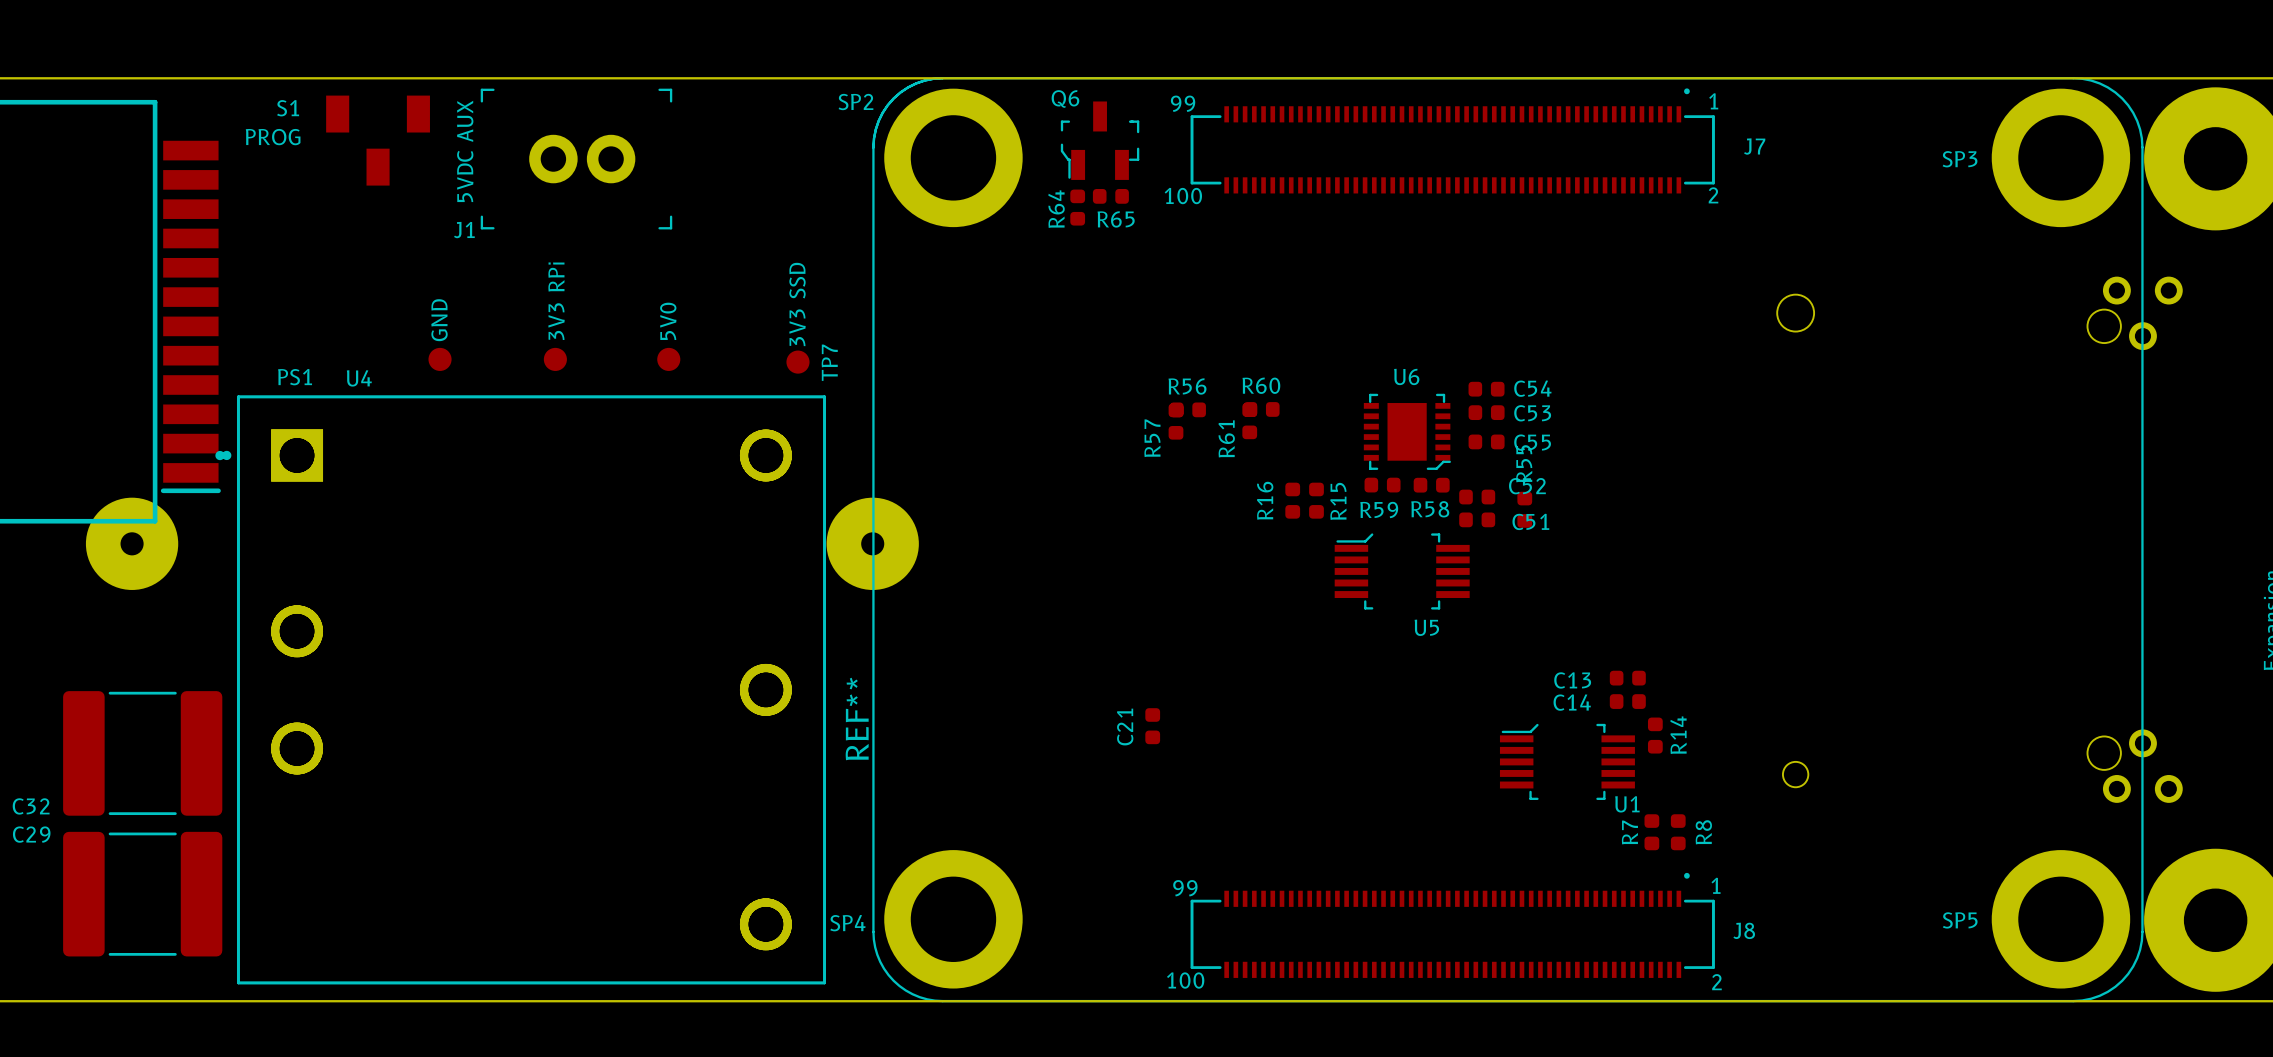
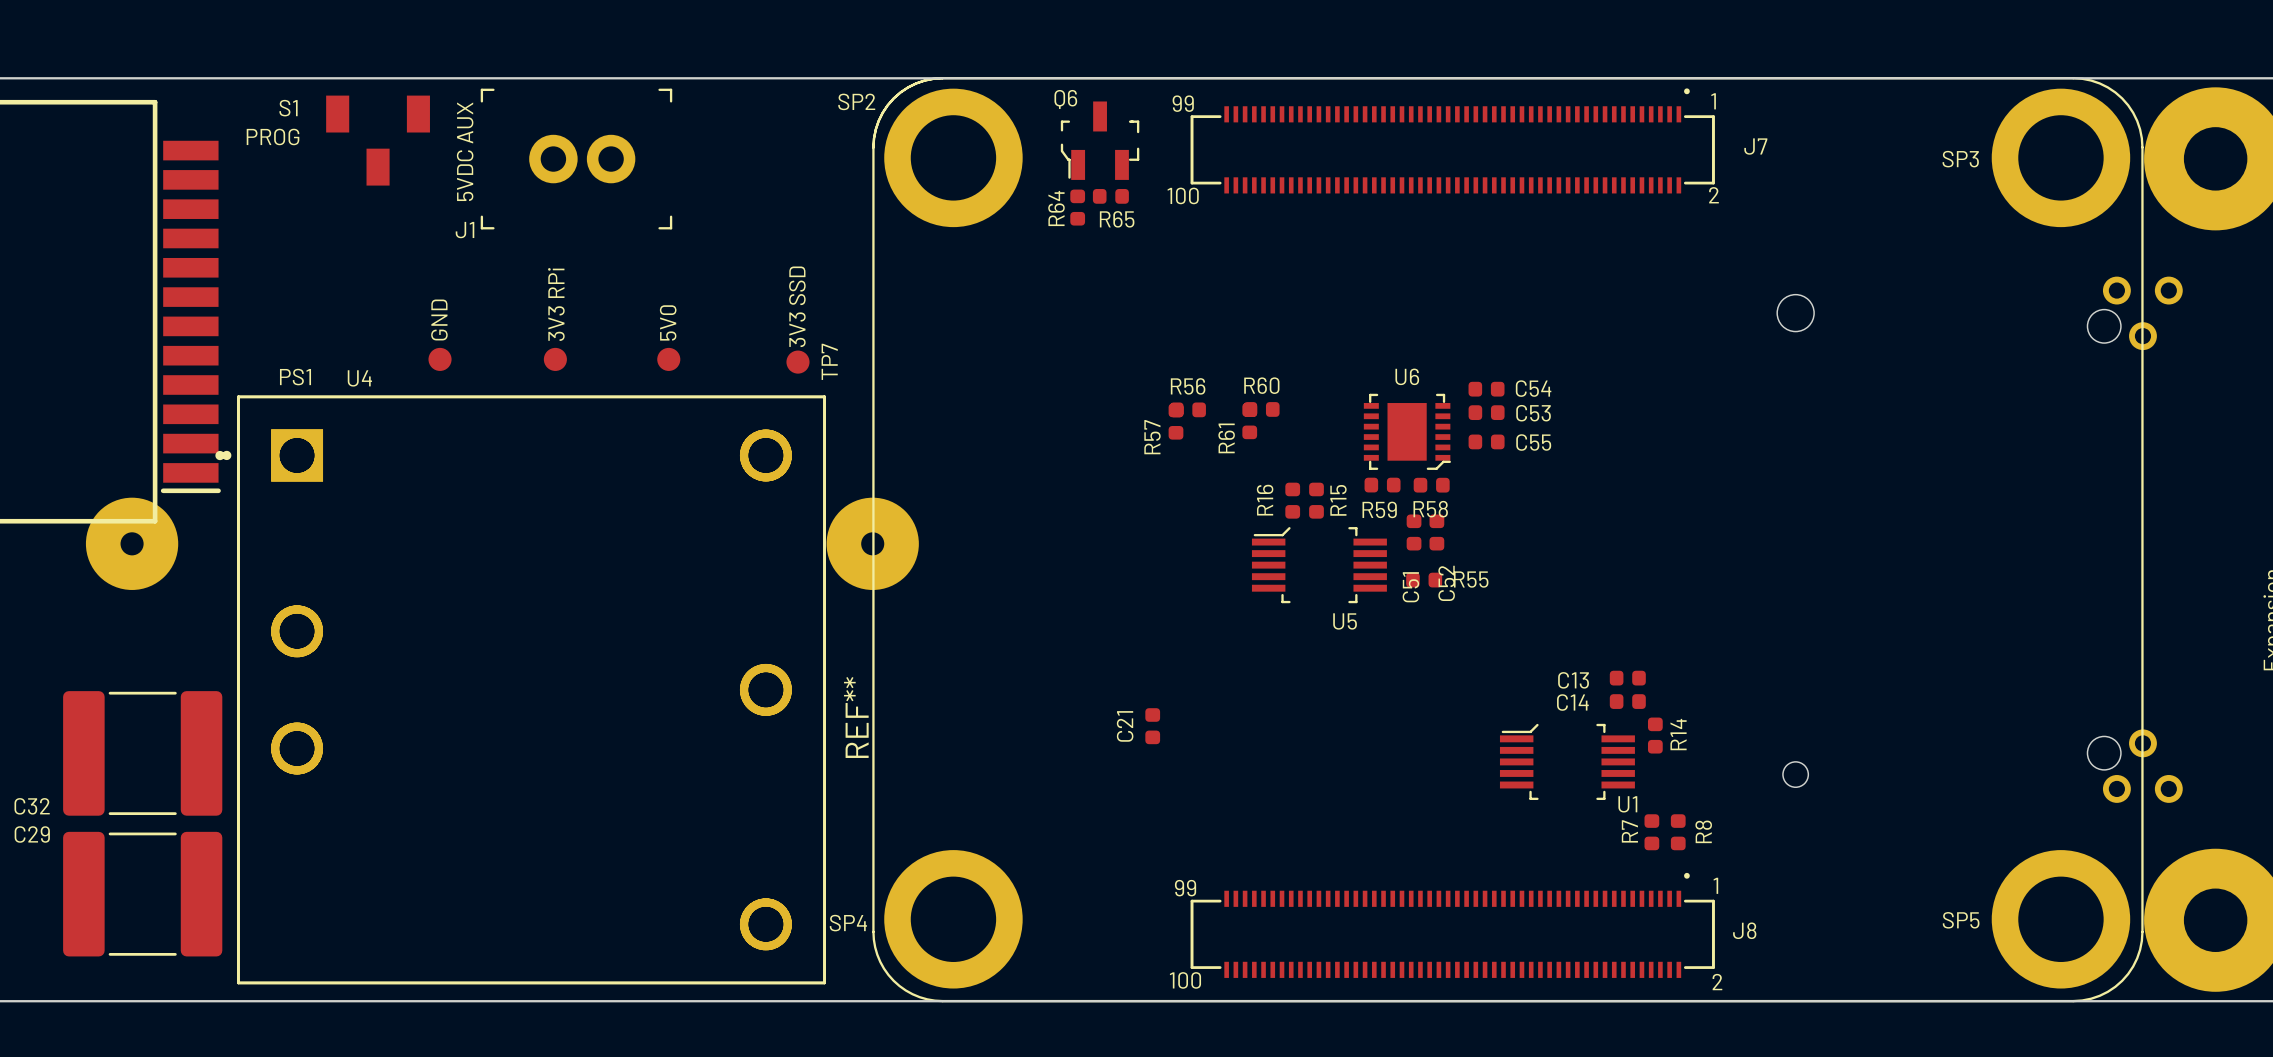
C52 rotation: 0° (1477, 497) -> 90° clockwise (1436, 532)
C52 position: (1477, 497) -> (1436, 532)
R55 rotation: 0° (1524, 509) -> 90° clockwise (1424, 580)
R55 position: (1524, 509) -> (1424, 580)
C51 rotation: 0° (1477, 519) -> 90° clockwise (1414, 532)
C51 position: (1477, 519) -> (1414, 532)
U5 position: (1402, 571) -> (1319, 565)

